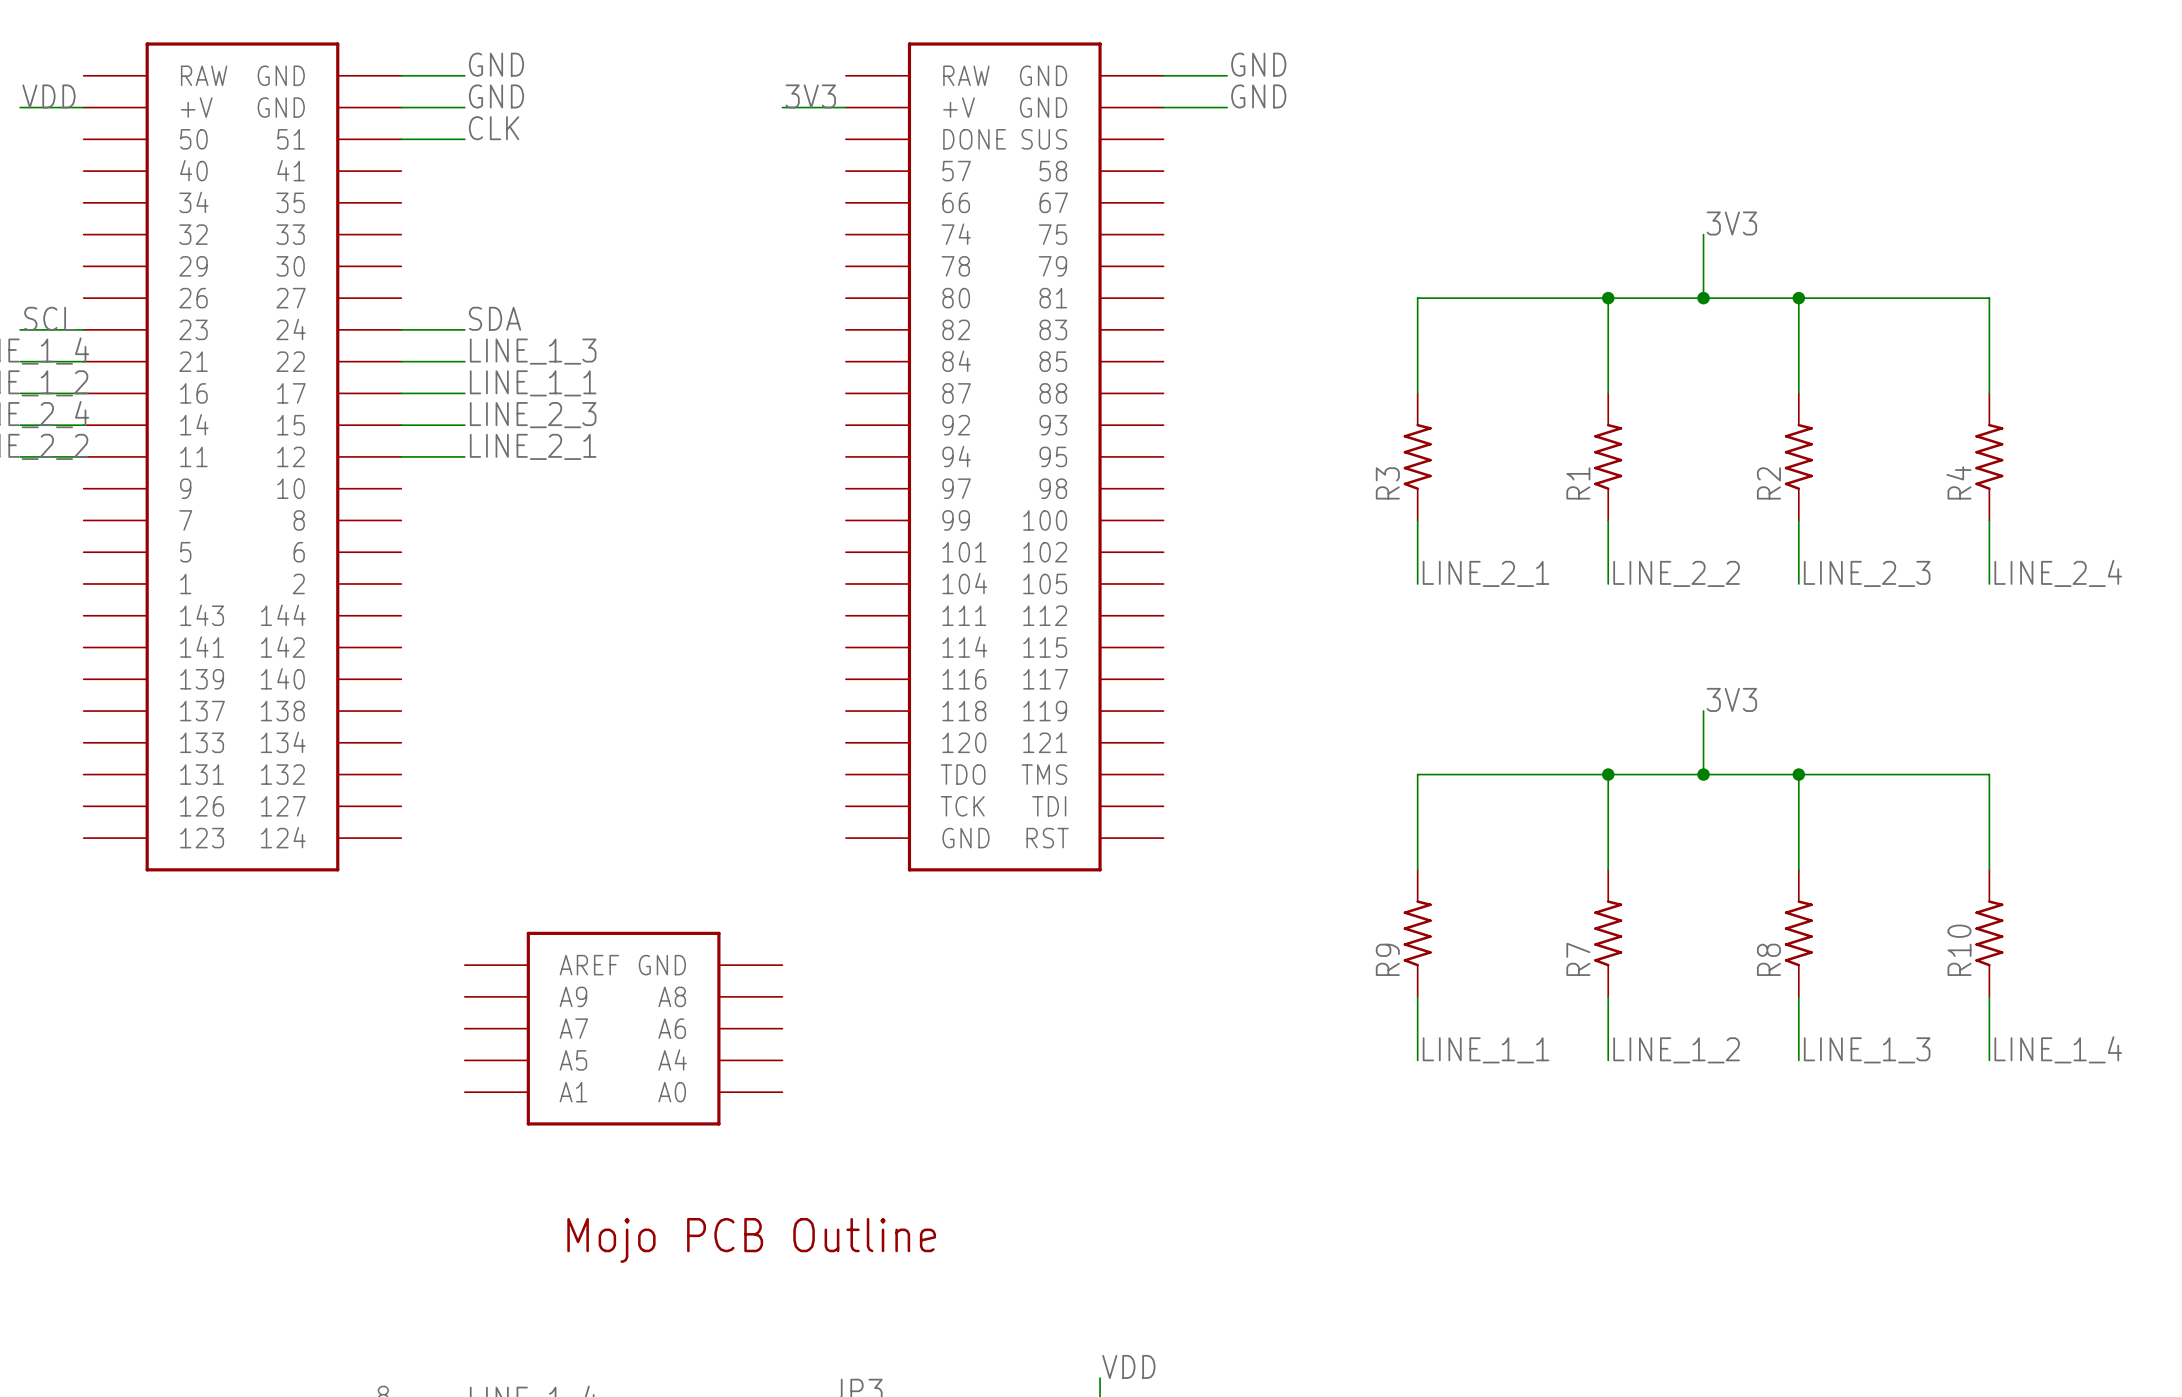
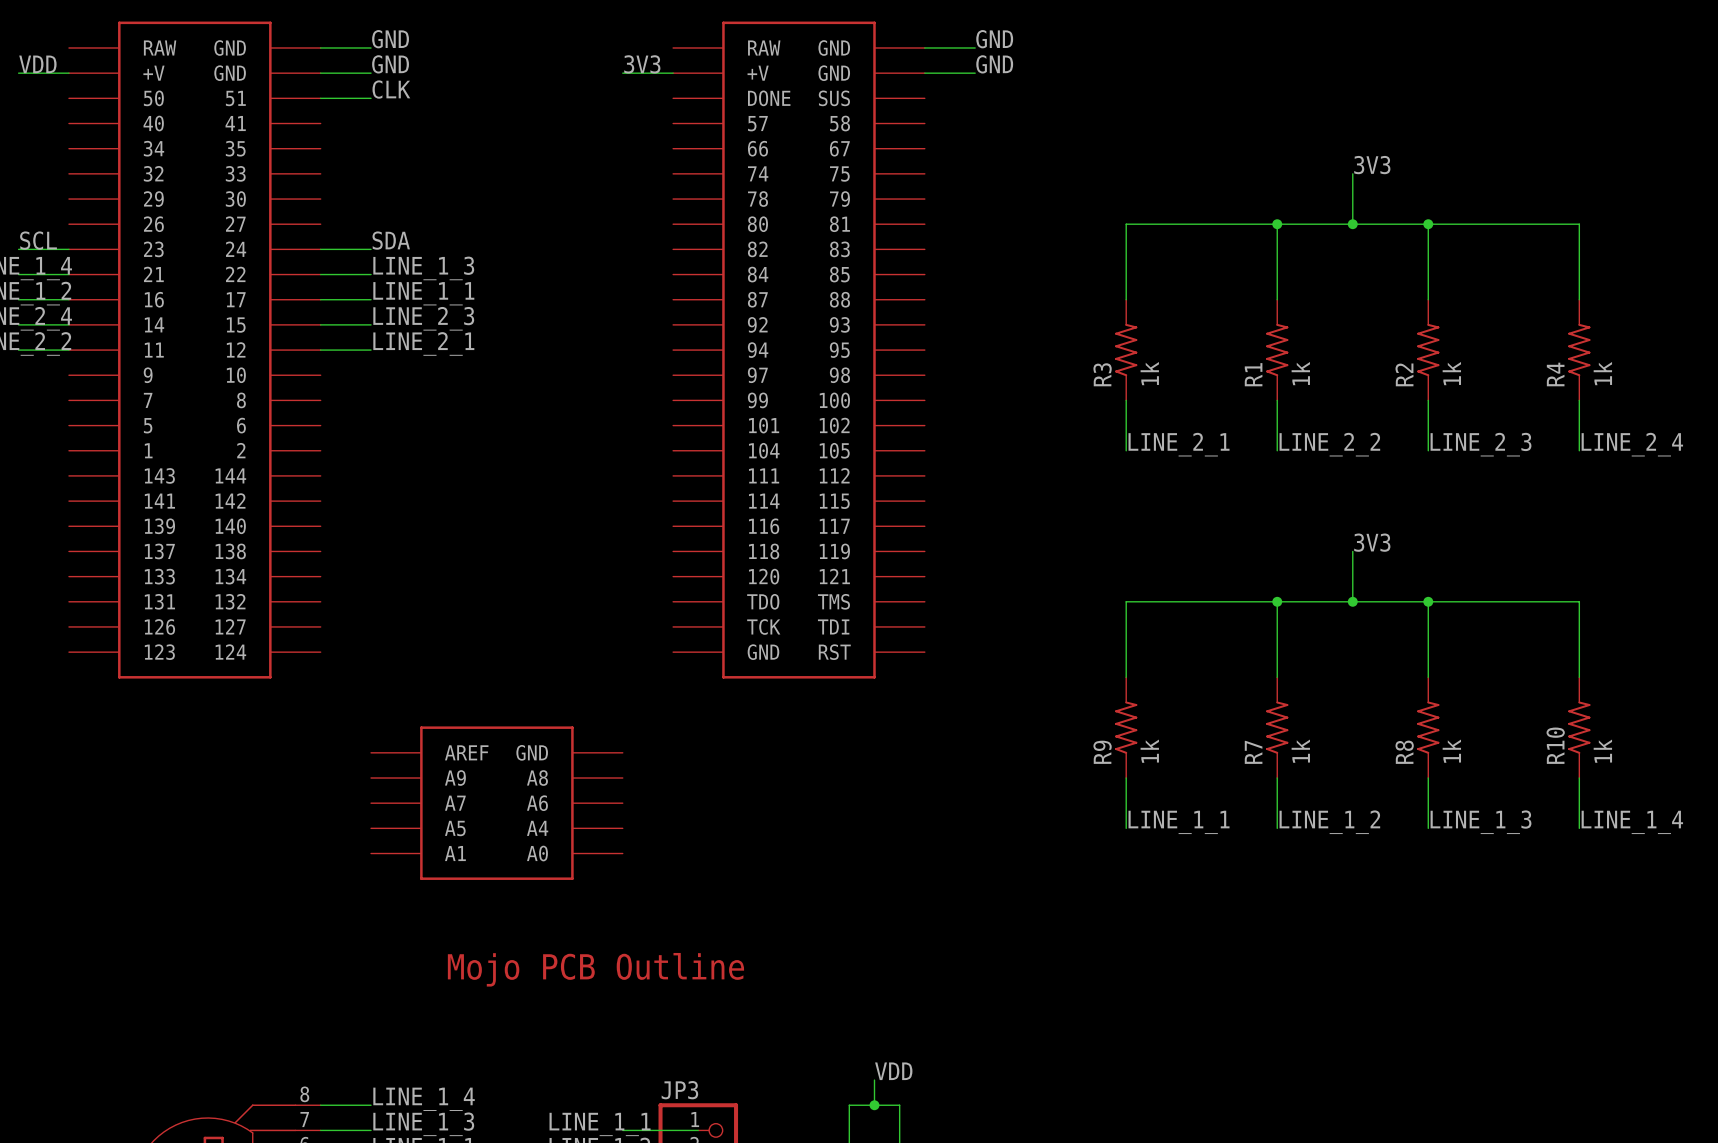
R3 value: none -> 1k (1149, 373)
R1 value: none -> 1k (1300, 373)
R2 value: none -> 1k (1451, 373)
R4 value: none -> 1k (1602, 373)
R9 value: none -> 1k (1149, 751)
R7 value: none -> 1k (1300, 751)
R8 value: none -> 1k (1451, 751)
R10 value: none -> 1k (1602, 751)

